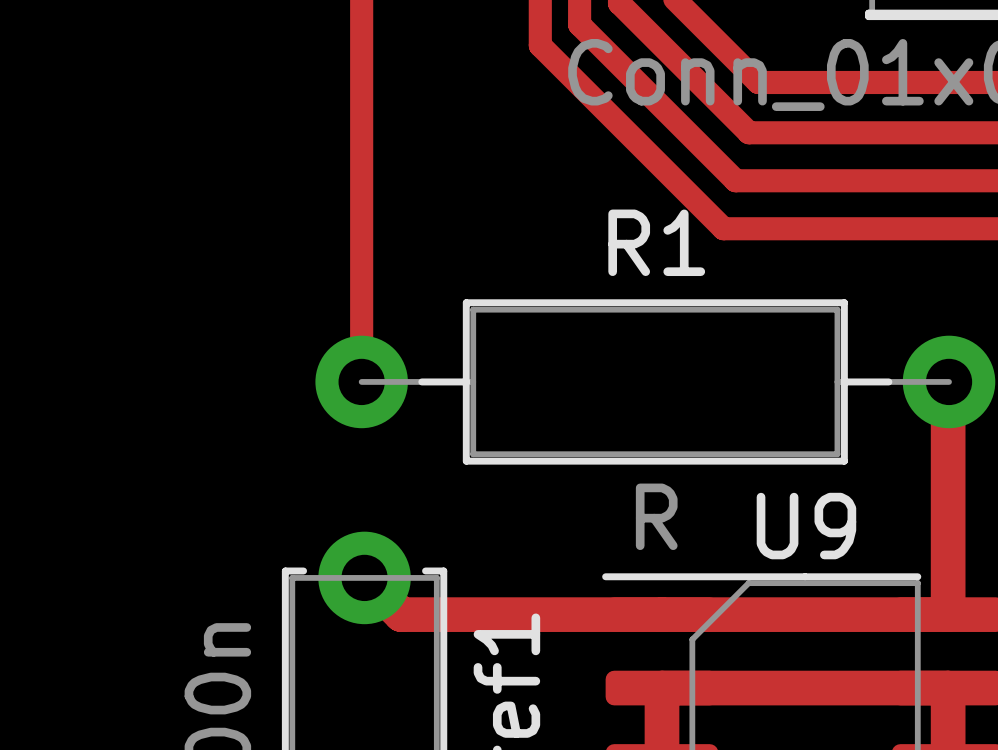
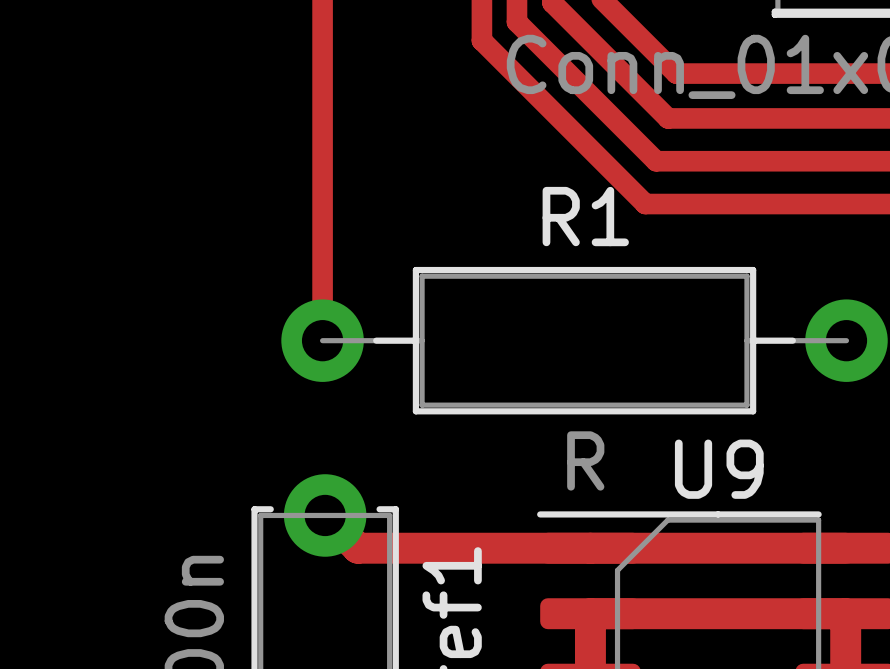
track: (949, 381) (948, 614) -> none

